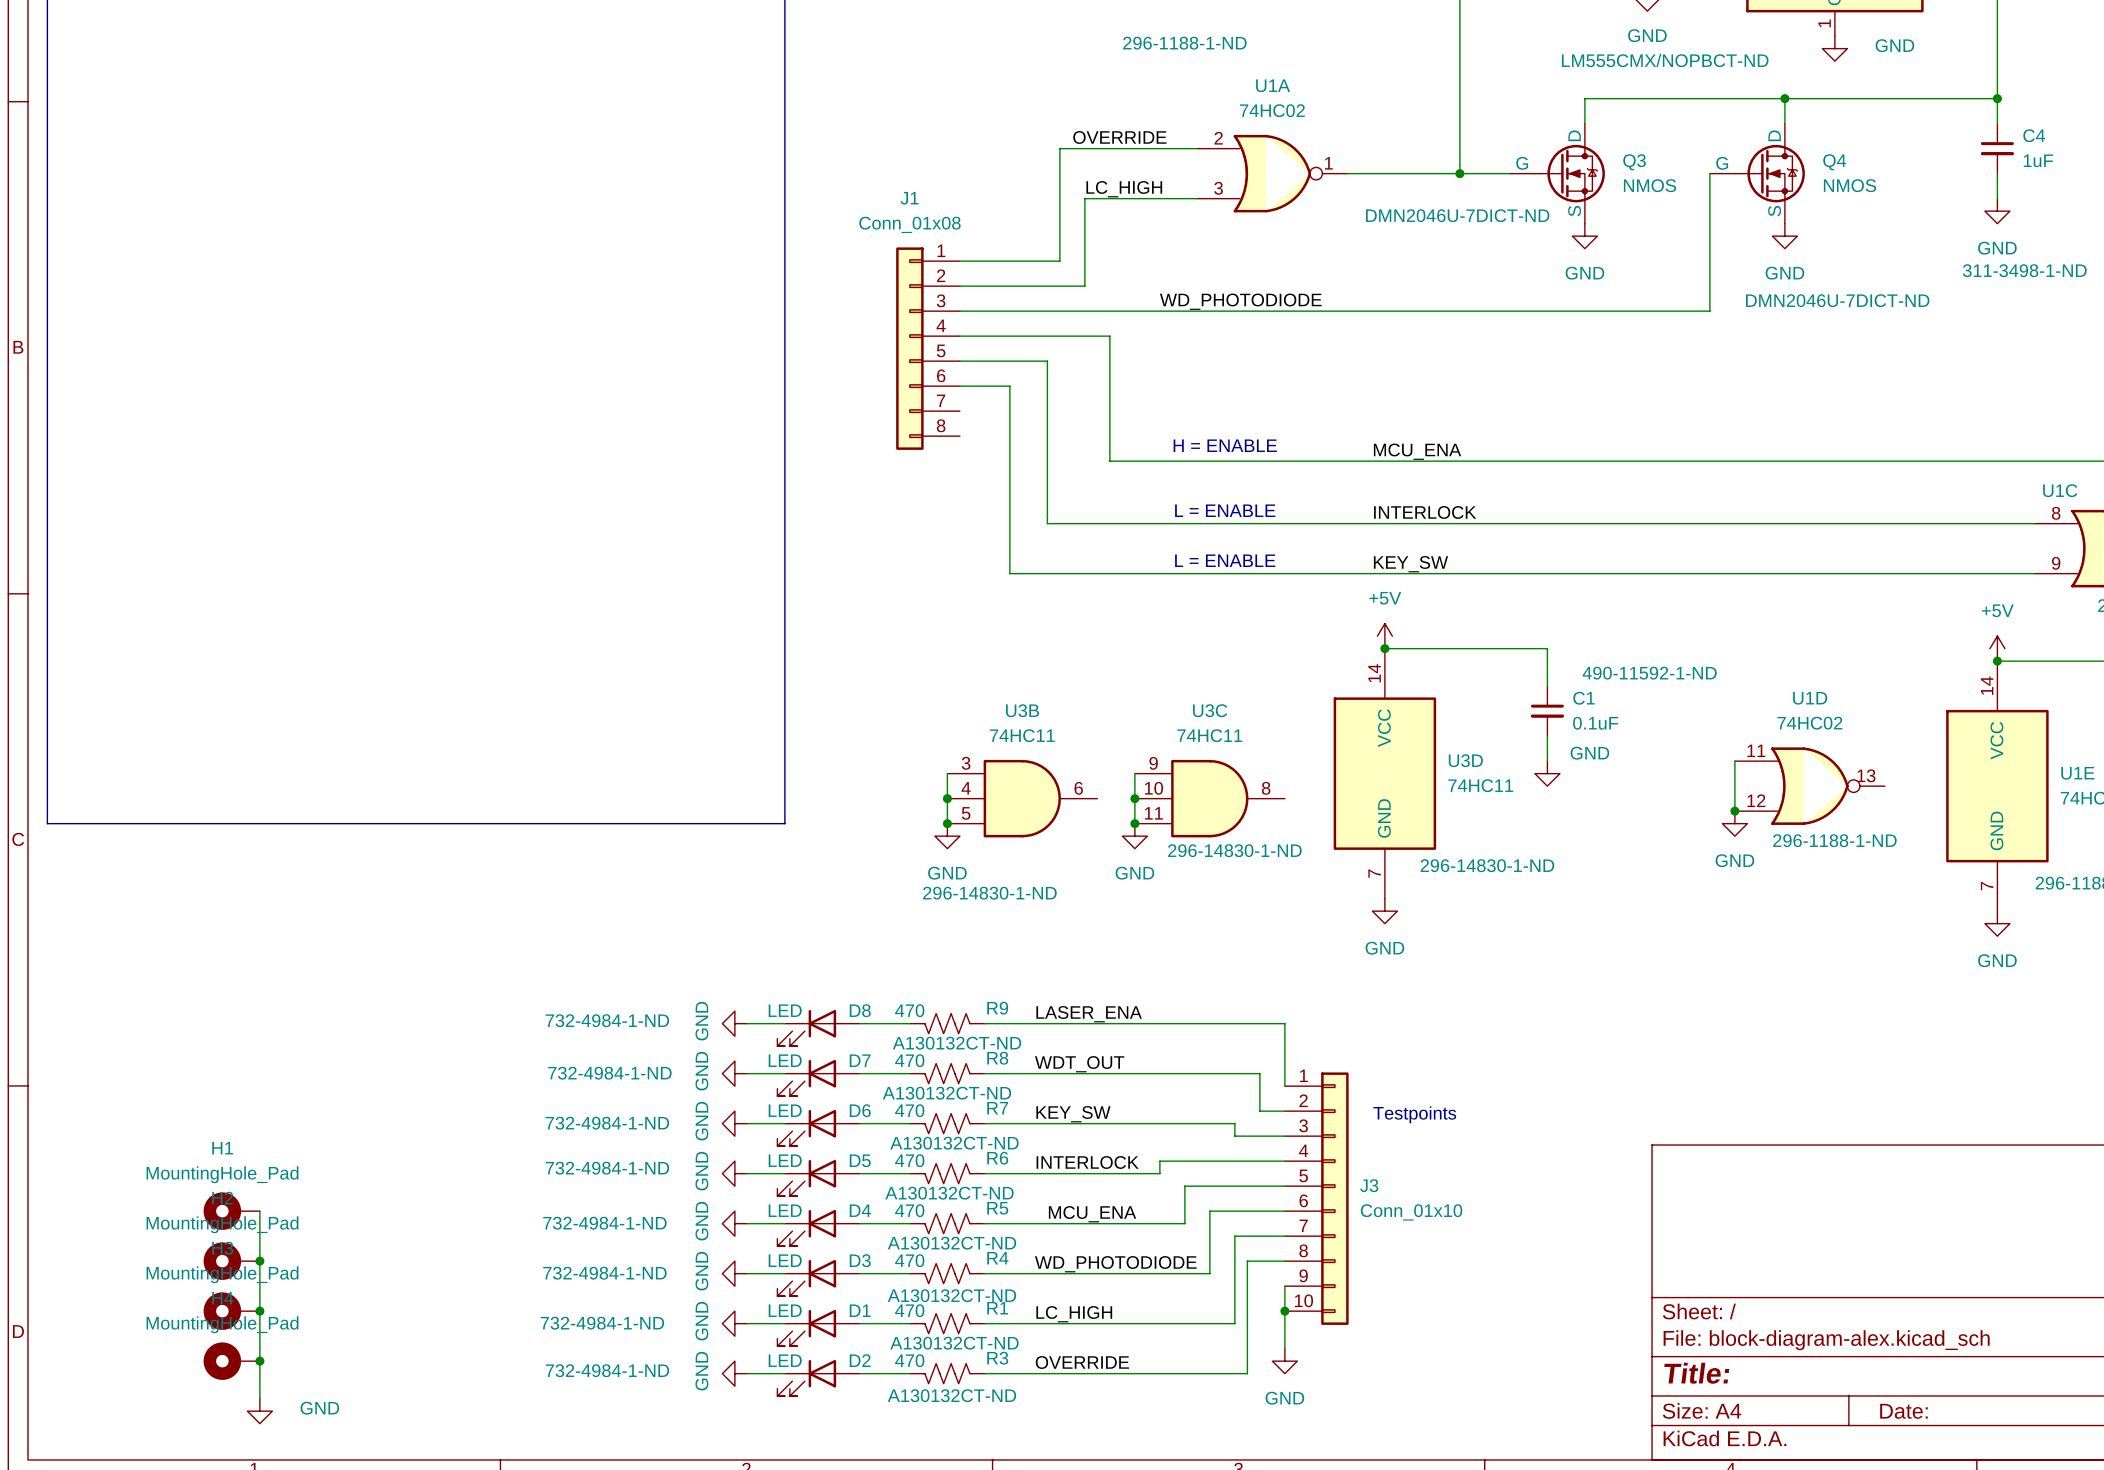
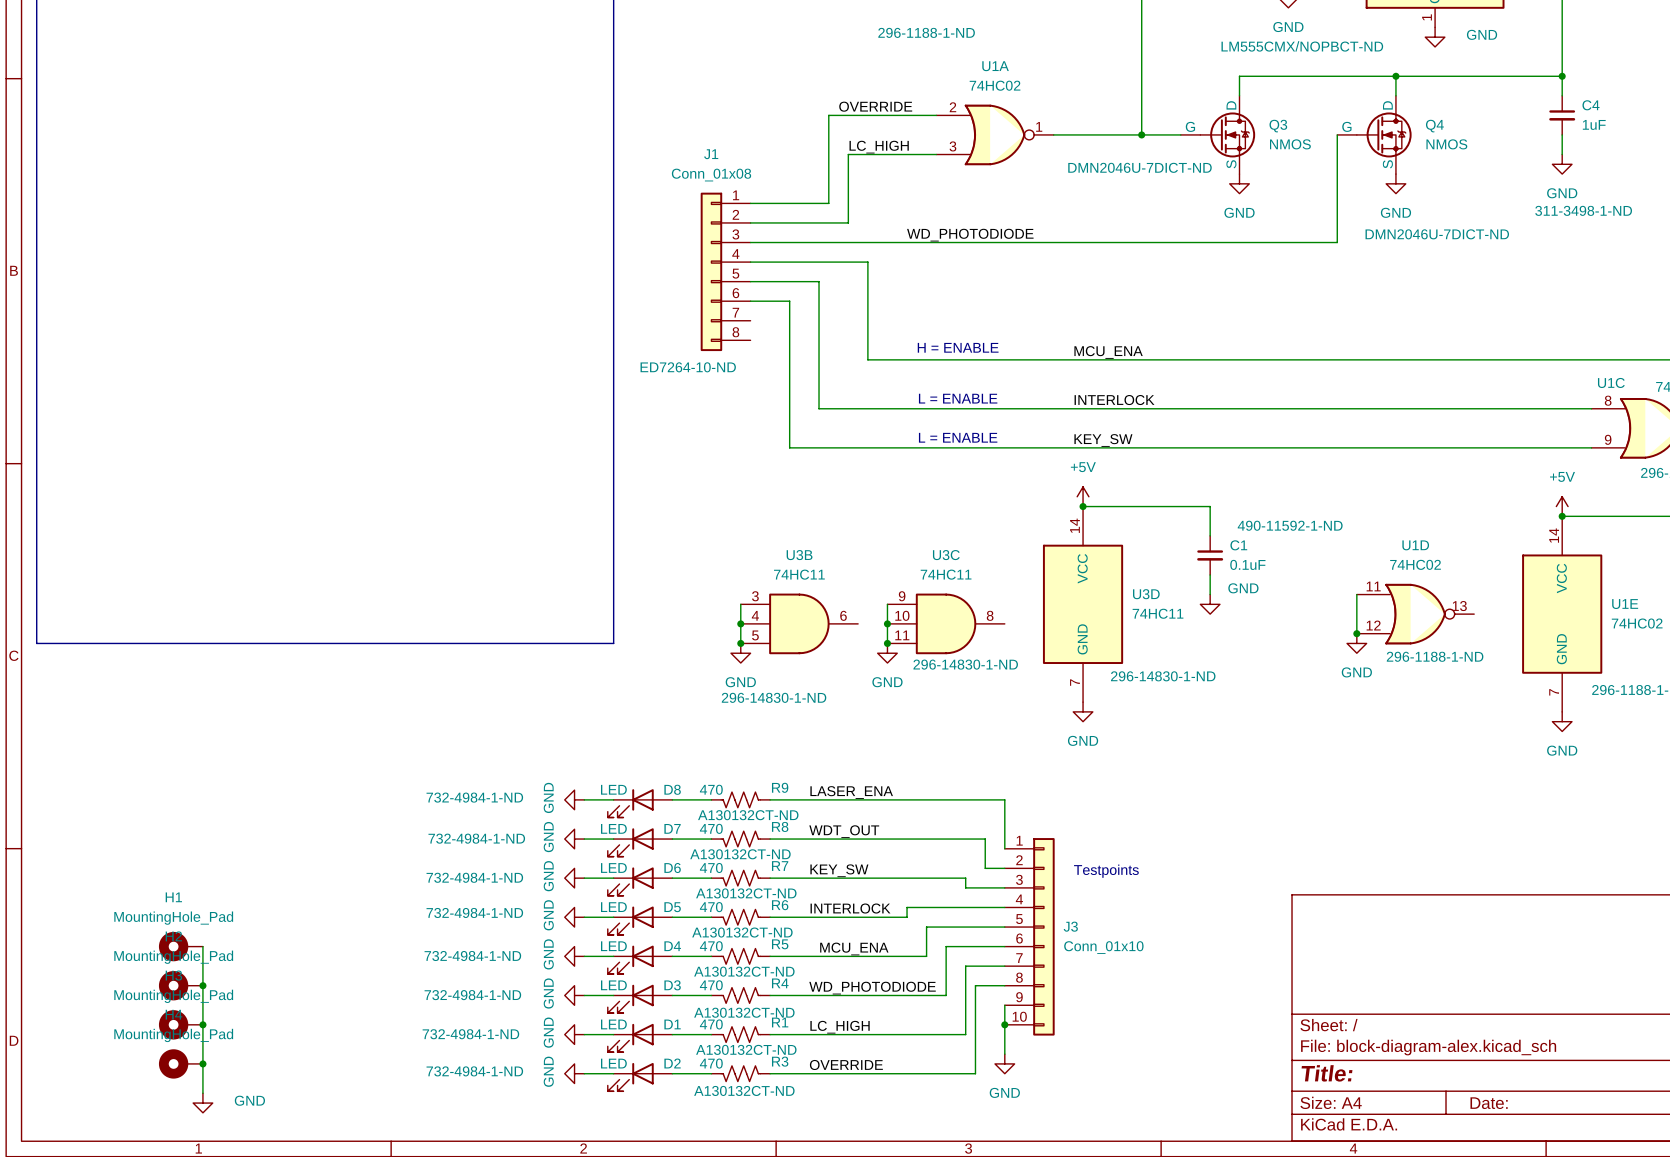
J1 text: none -> ED7264-10-ND (688, 367)

